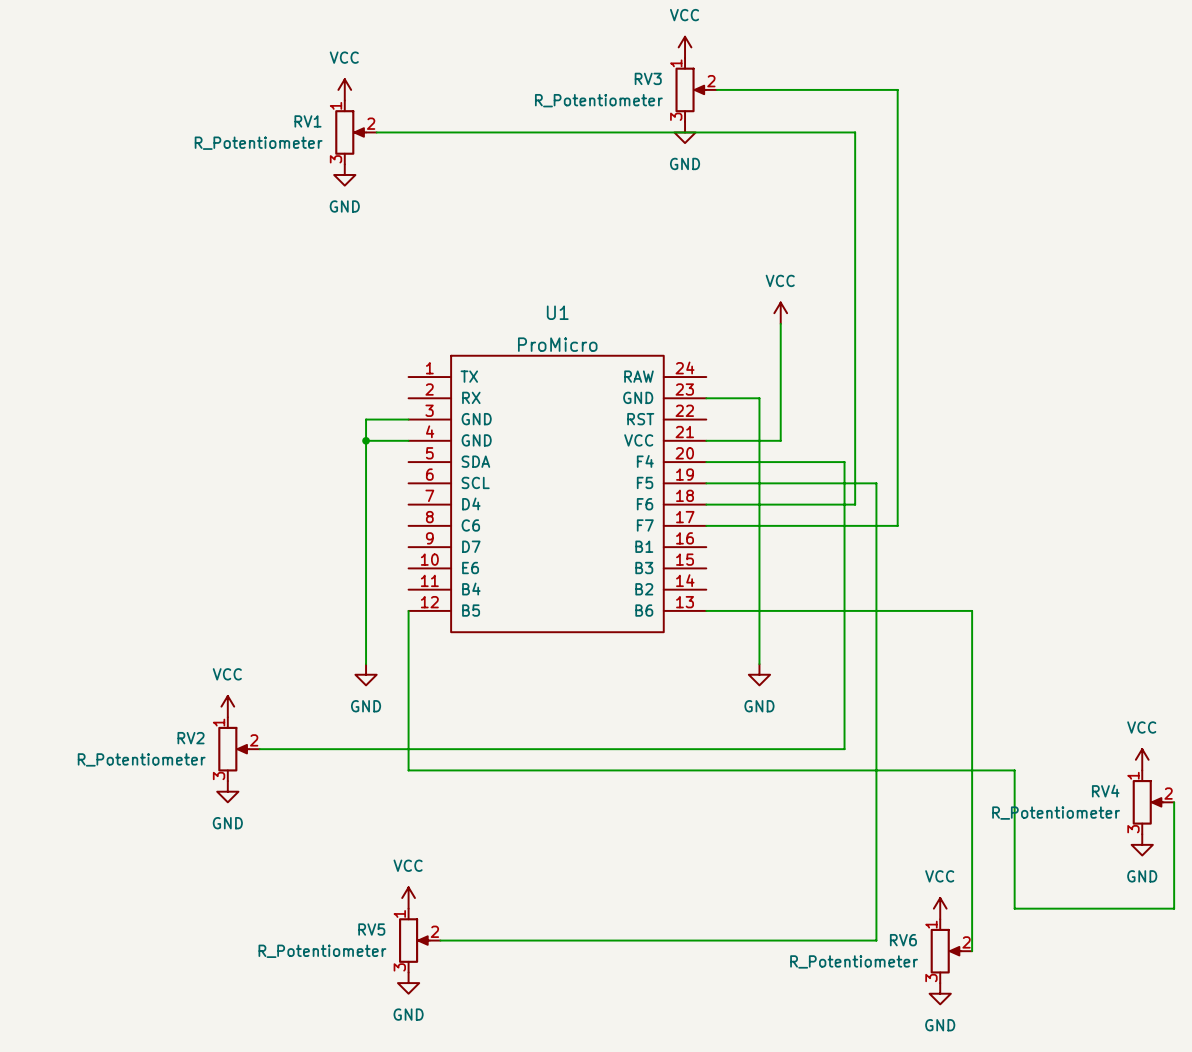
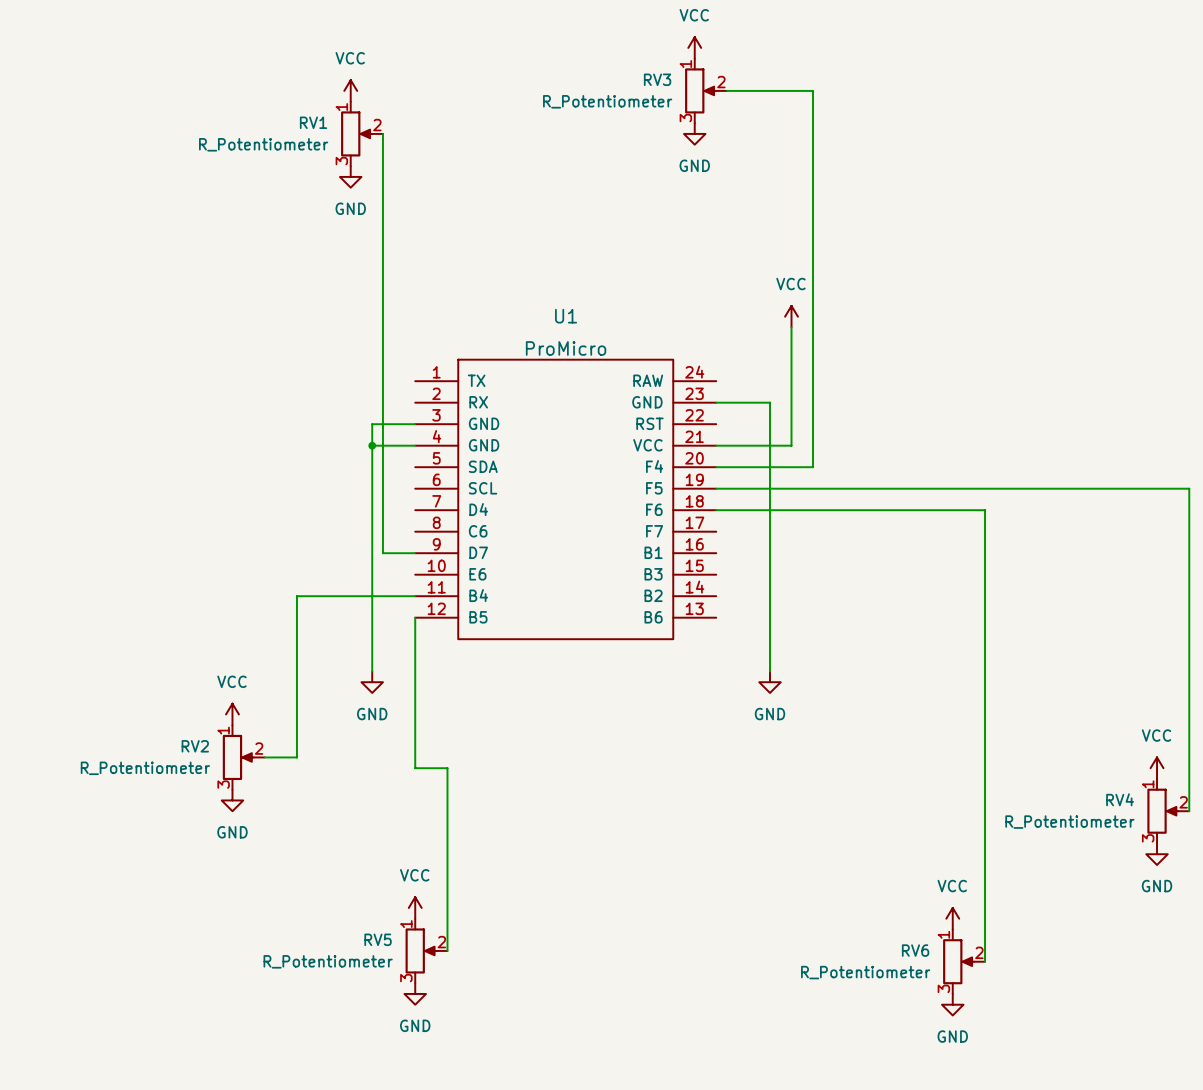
wire: (801, 89) (897, 89) (897, 525) (706, 525) -> (813, 90) (813, 467)
wire: (376, 132) (855, 132) (855, 504) -> (382, 133) (382, 553) (415, 553)
wire: (801, 462) (844, 462) (844, 749) (291, 749) -> (415, 596) (296, 596) (296, 757)
wire: (876, 483) (876, 940) (440, 940) -> (415, 768) (447, 768) (447, 950)
wire: (706, 610) (972, 610) -> (866, 510) (985, 510) (985, 617)
wire: (408, 759) (408, 770) (1014, 770) (1014, 908) (1174, 908) (1174, 802) -> (888, 488) (1189, 488) (1189, 811)

